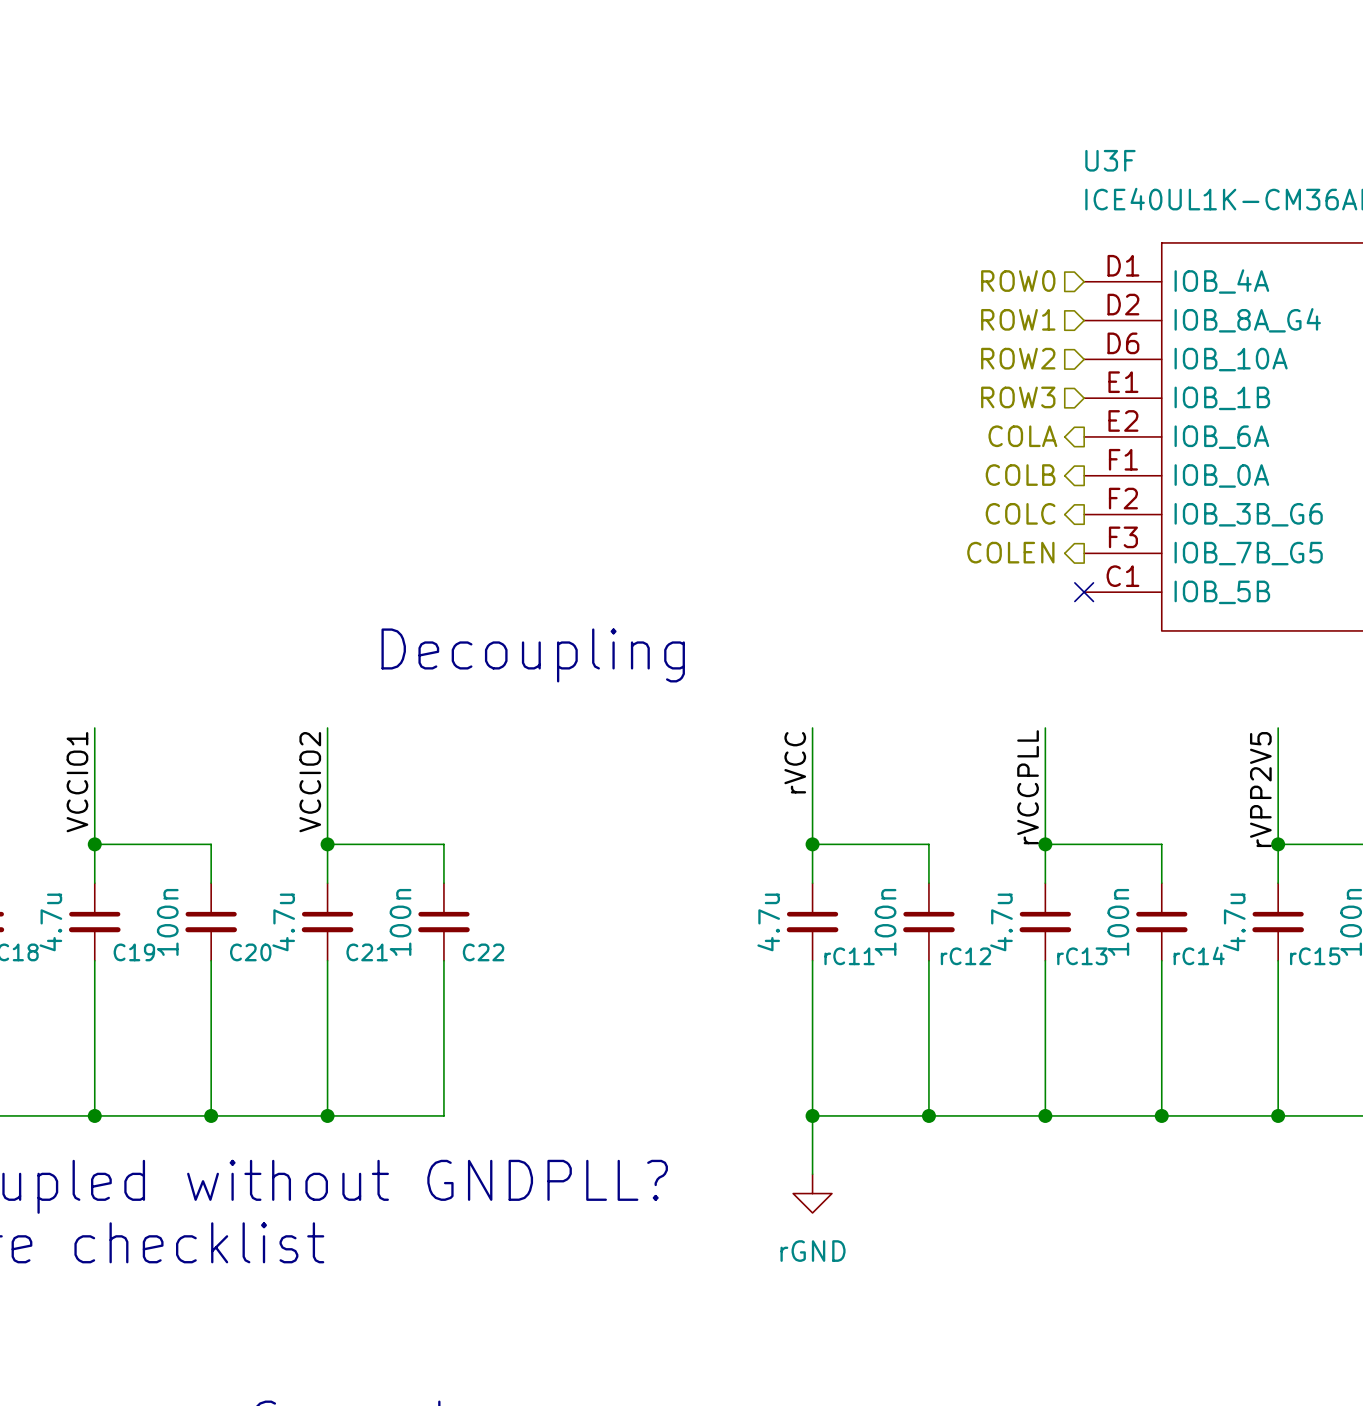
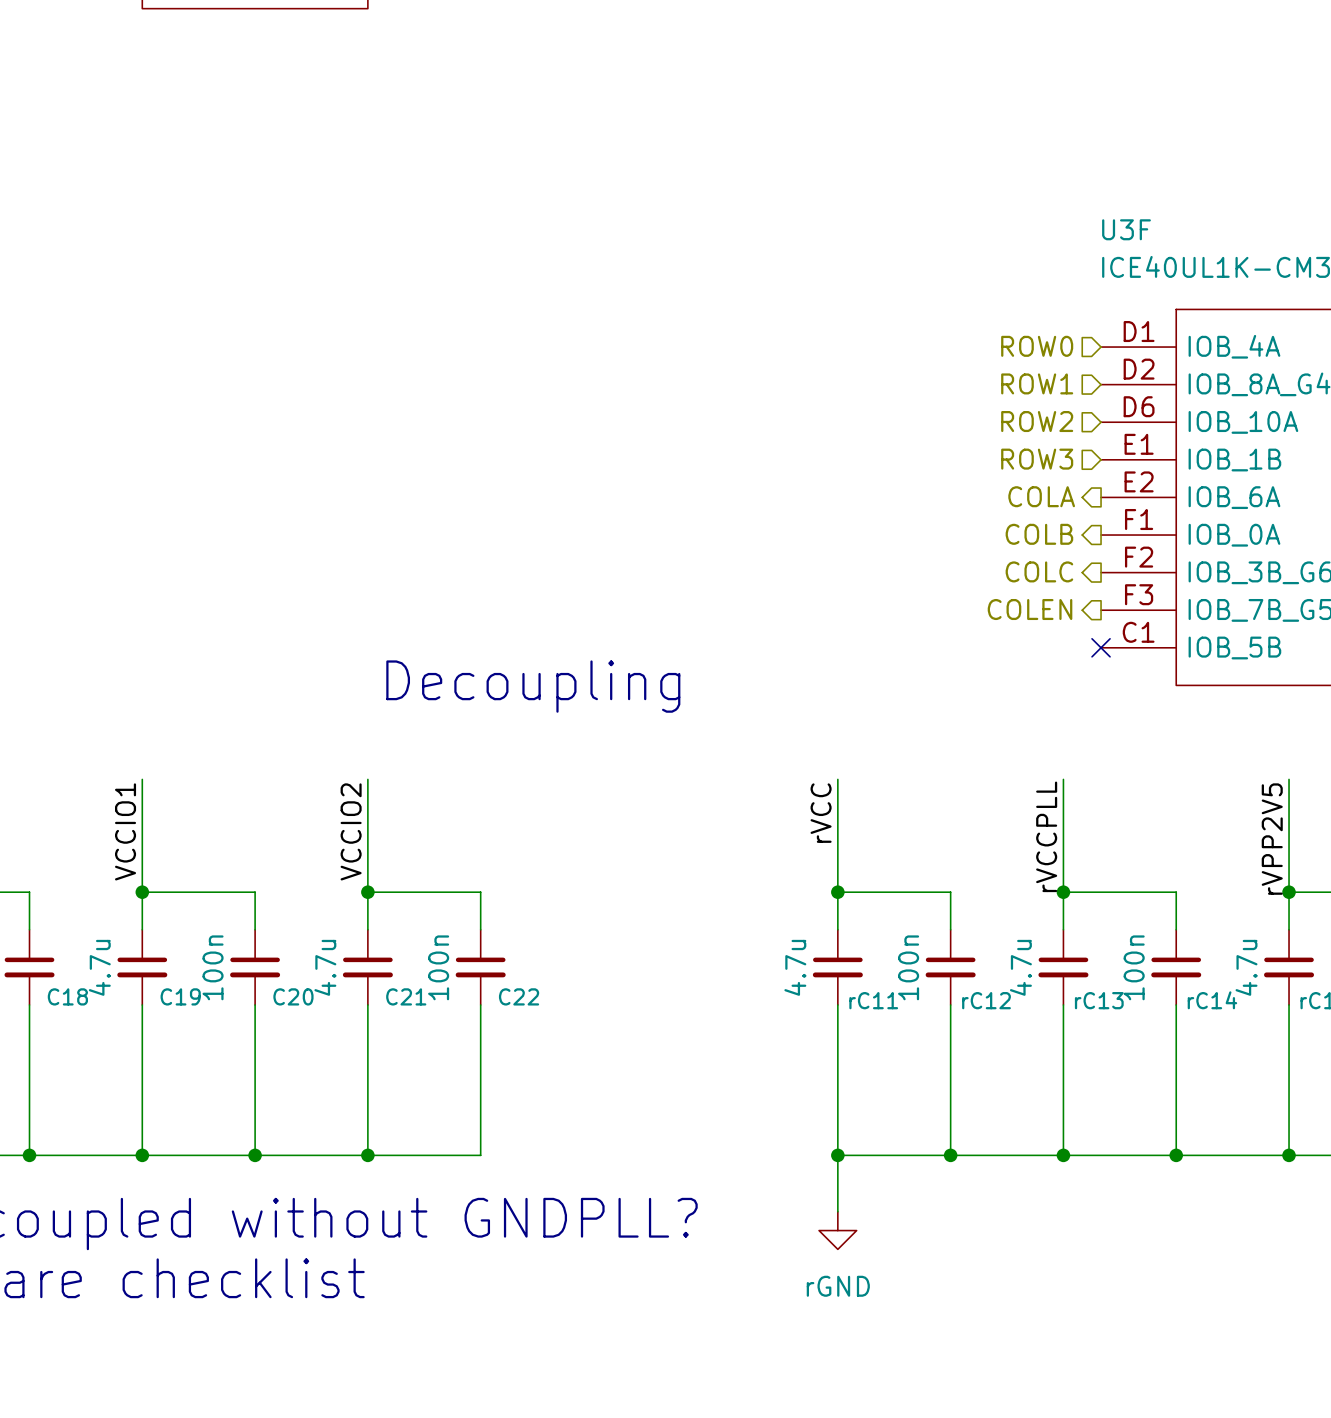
text position: Decoupling (533, 655) -> Decoupling (533, 686)

